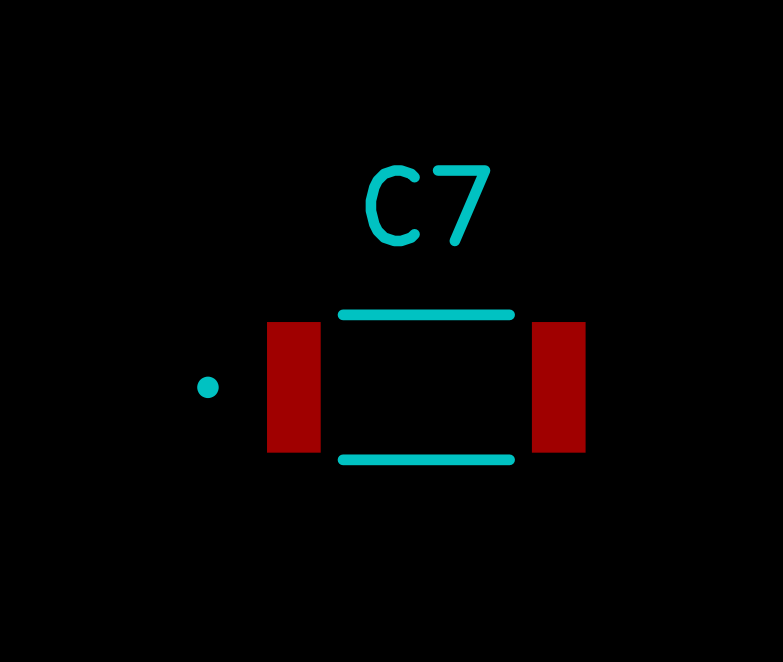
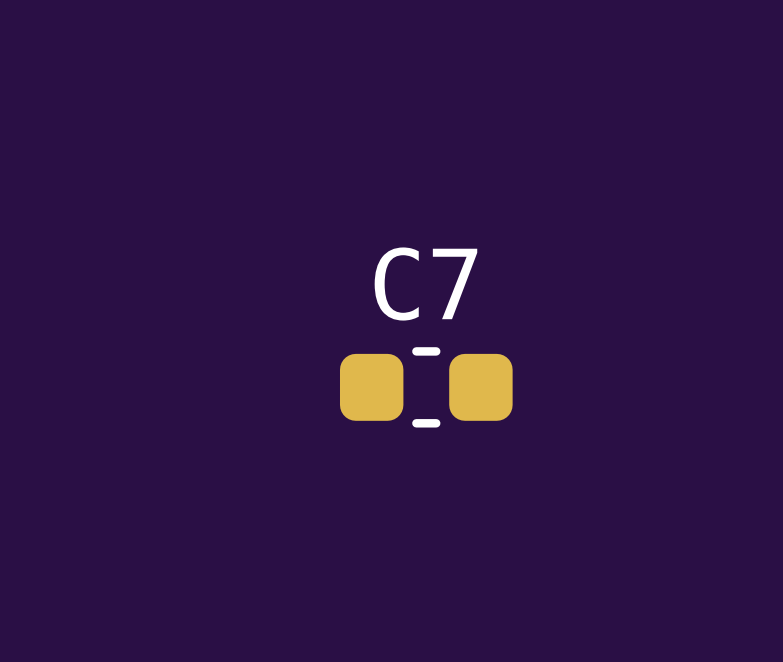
C7 footprint: [197, 309, 586, 466] -> [339, 347, 513, 428]

